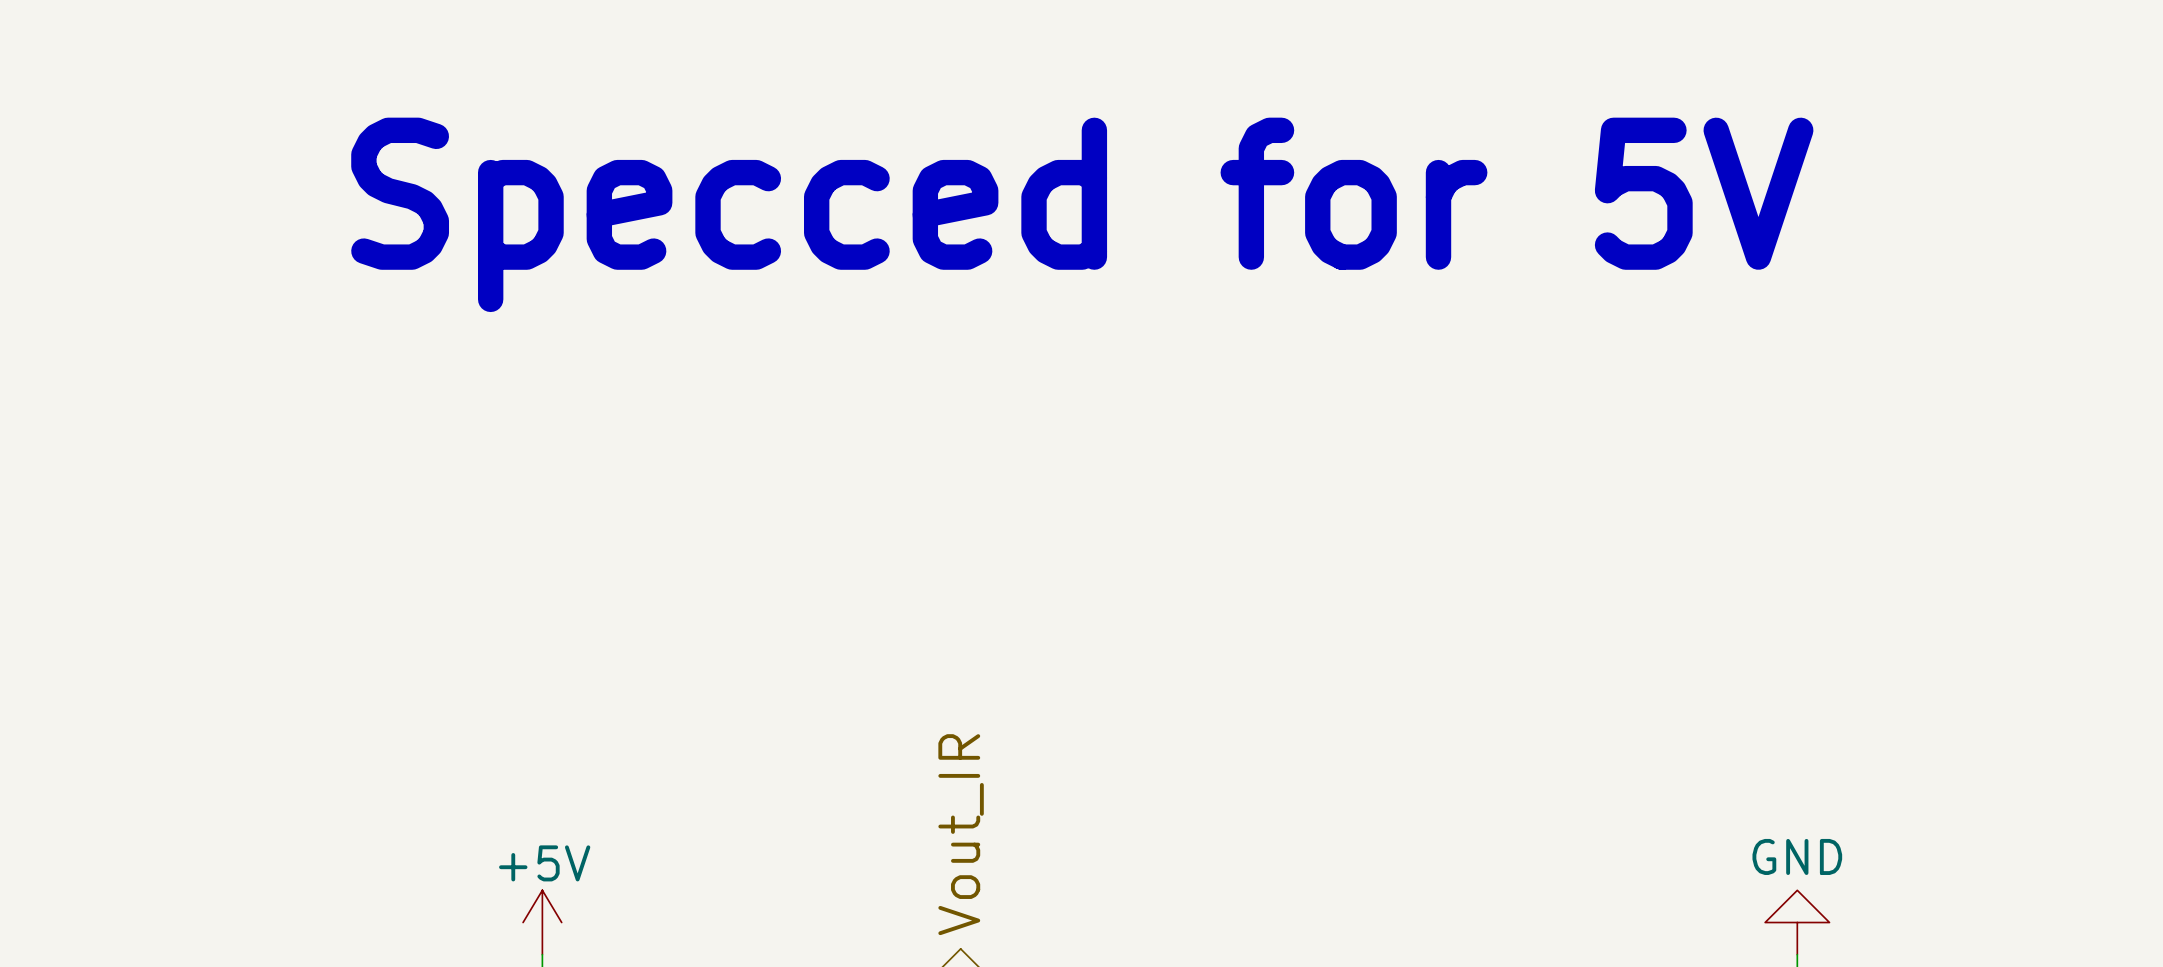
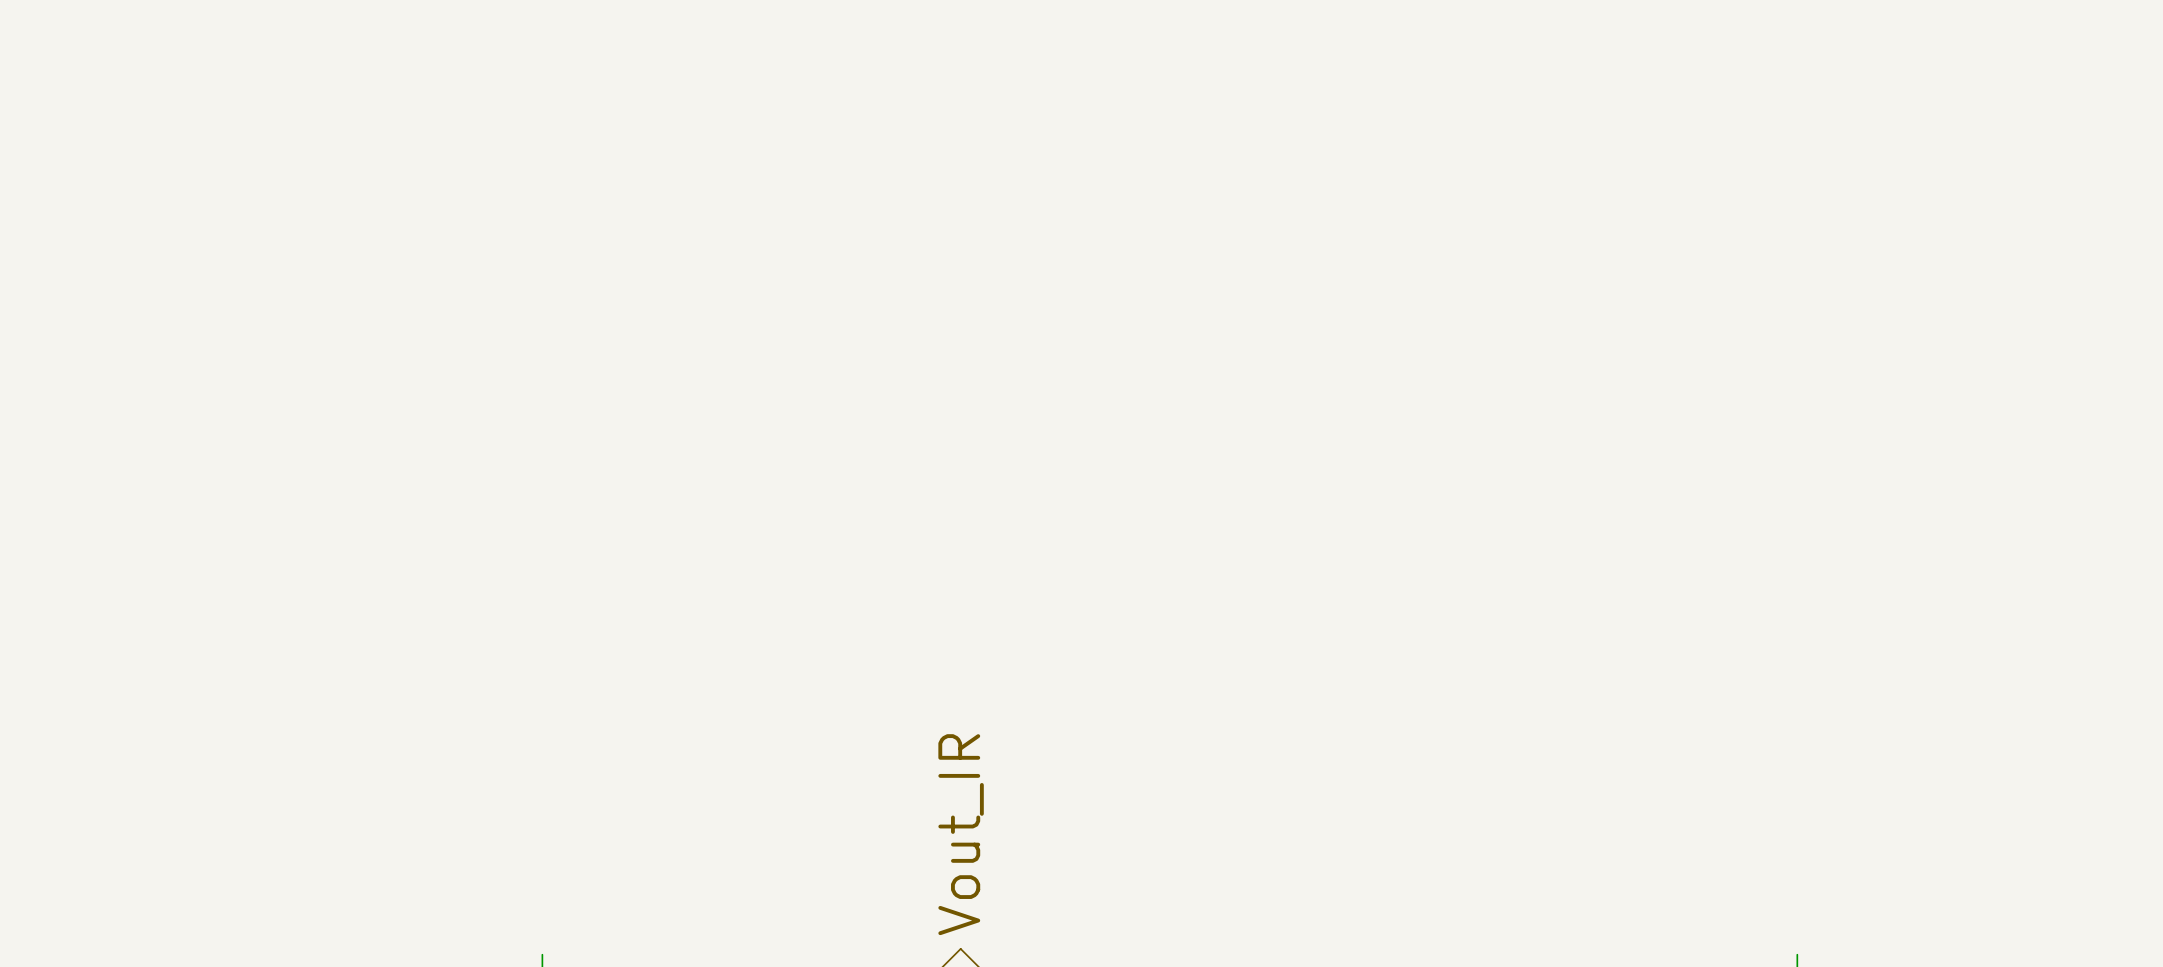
text: Specced for 5V (1082, 214) -> none
power symbol: +5V (542, 922) -> none
power symbol: GND (1797, 922) -> none

